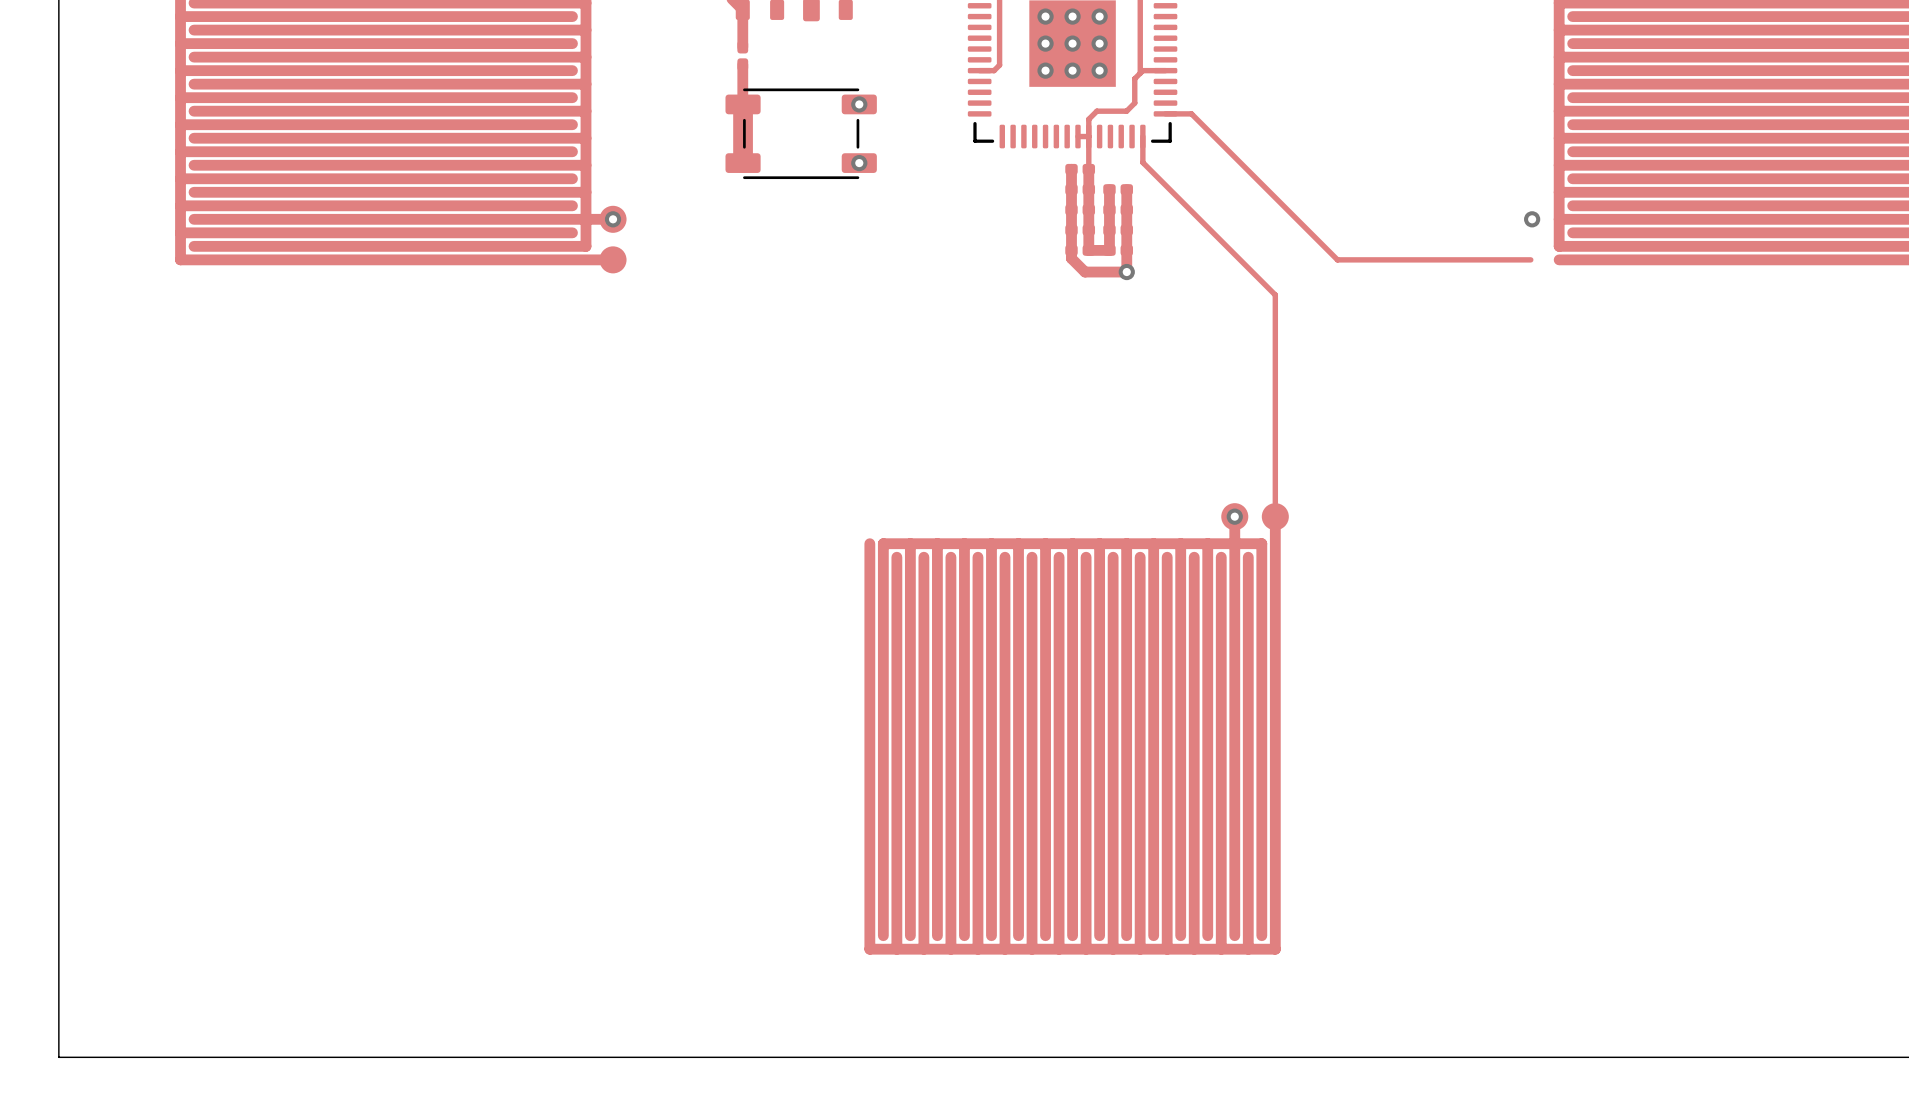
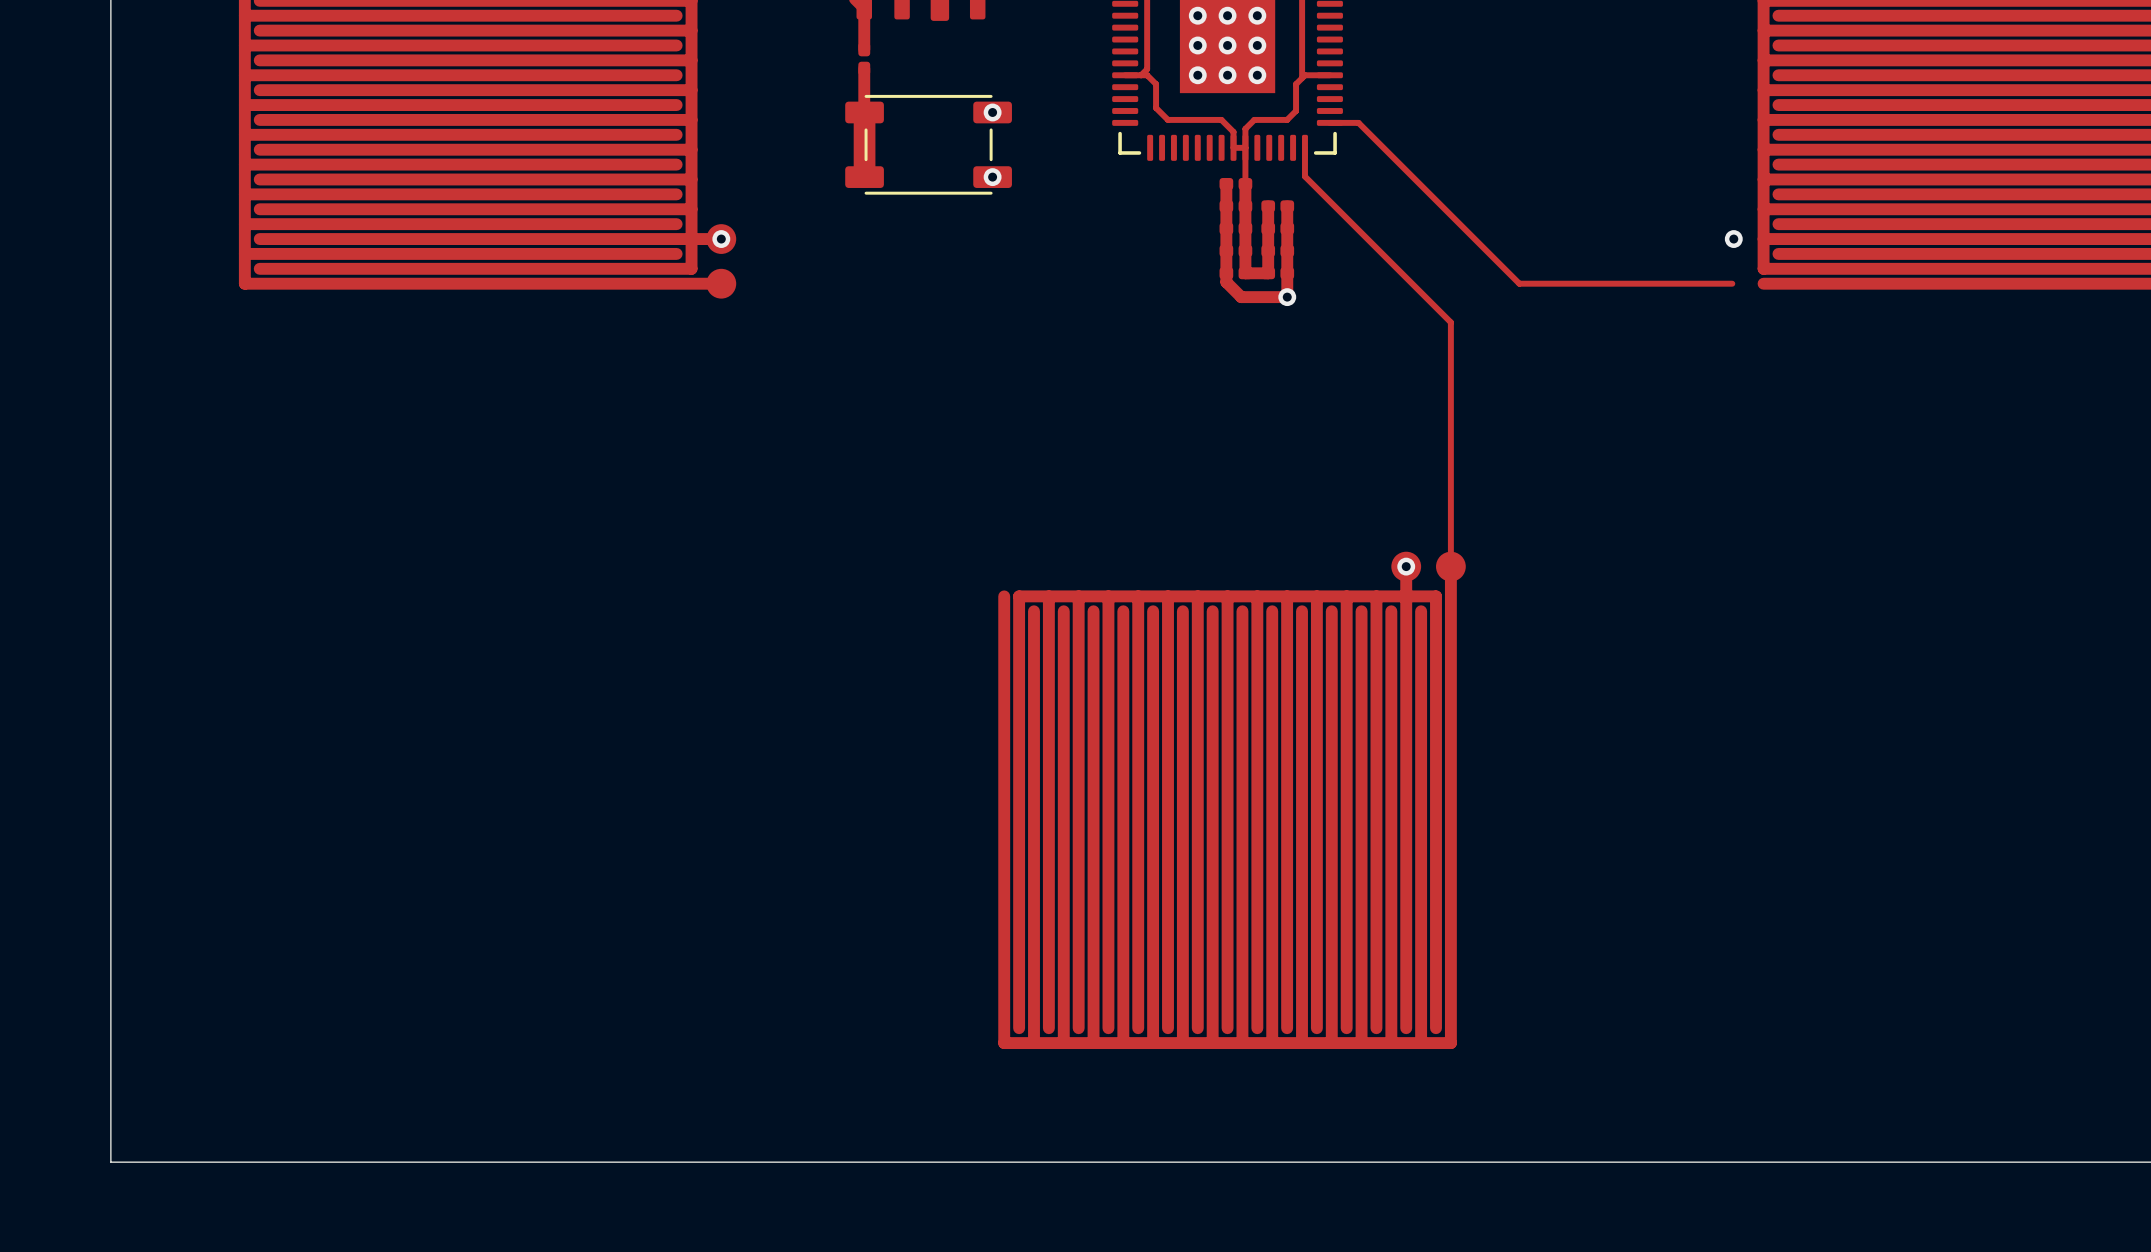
top track: none -> (1141, 75) (1147, 75) (1156, 84) (1156, 107) (1168, 119) (1221, 119) (1233, 131) (1233, 147)

